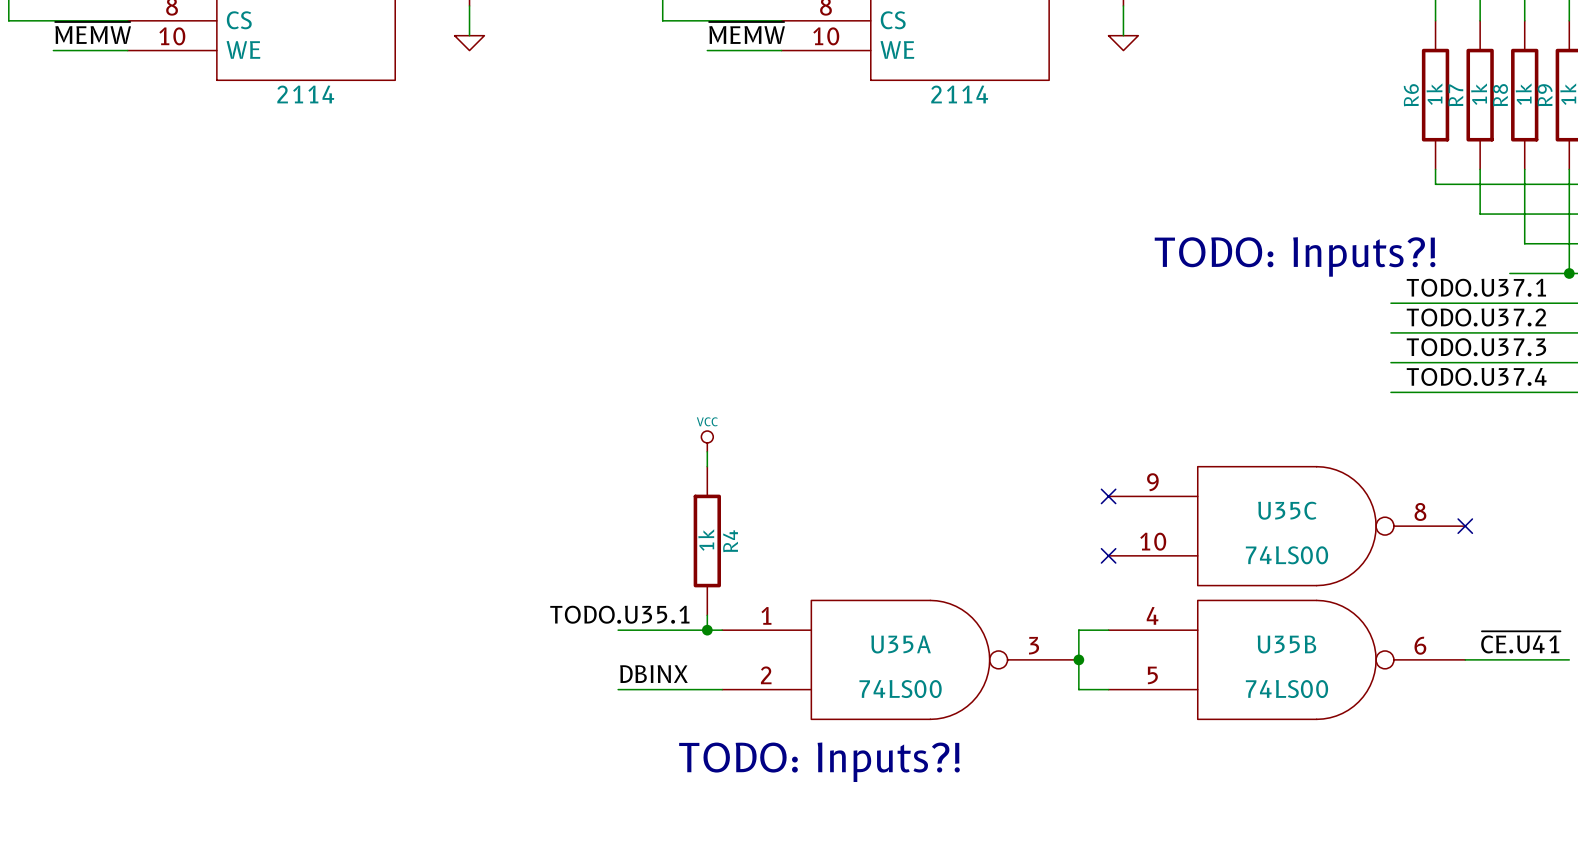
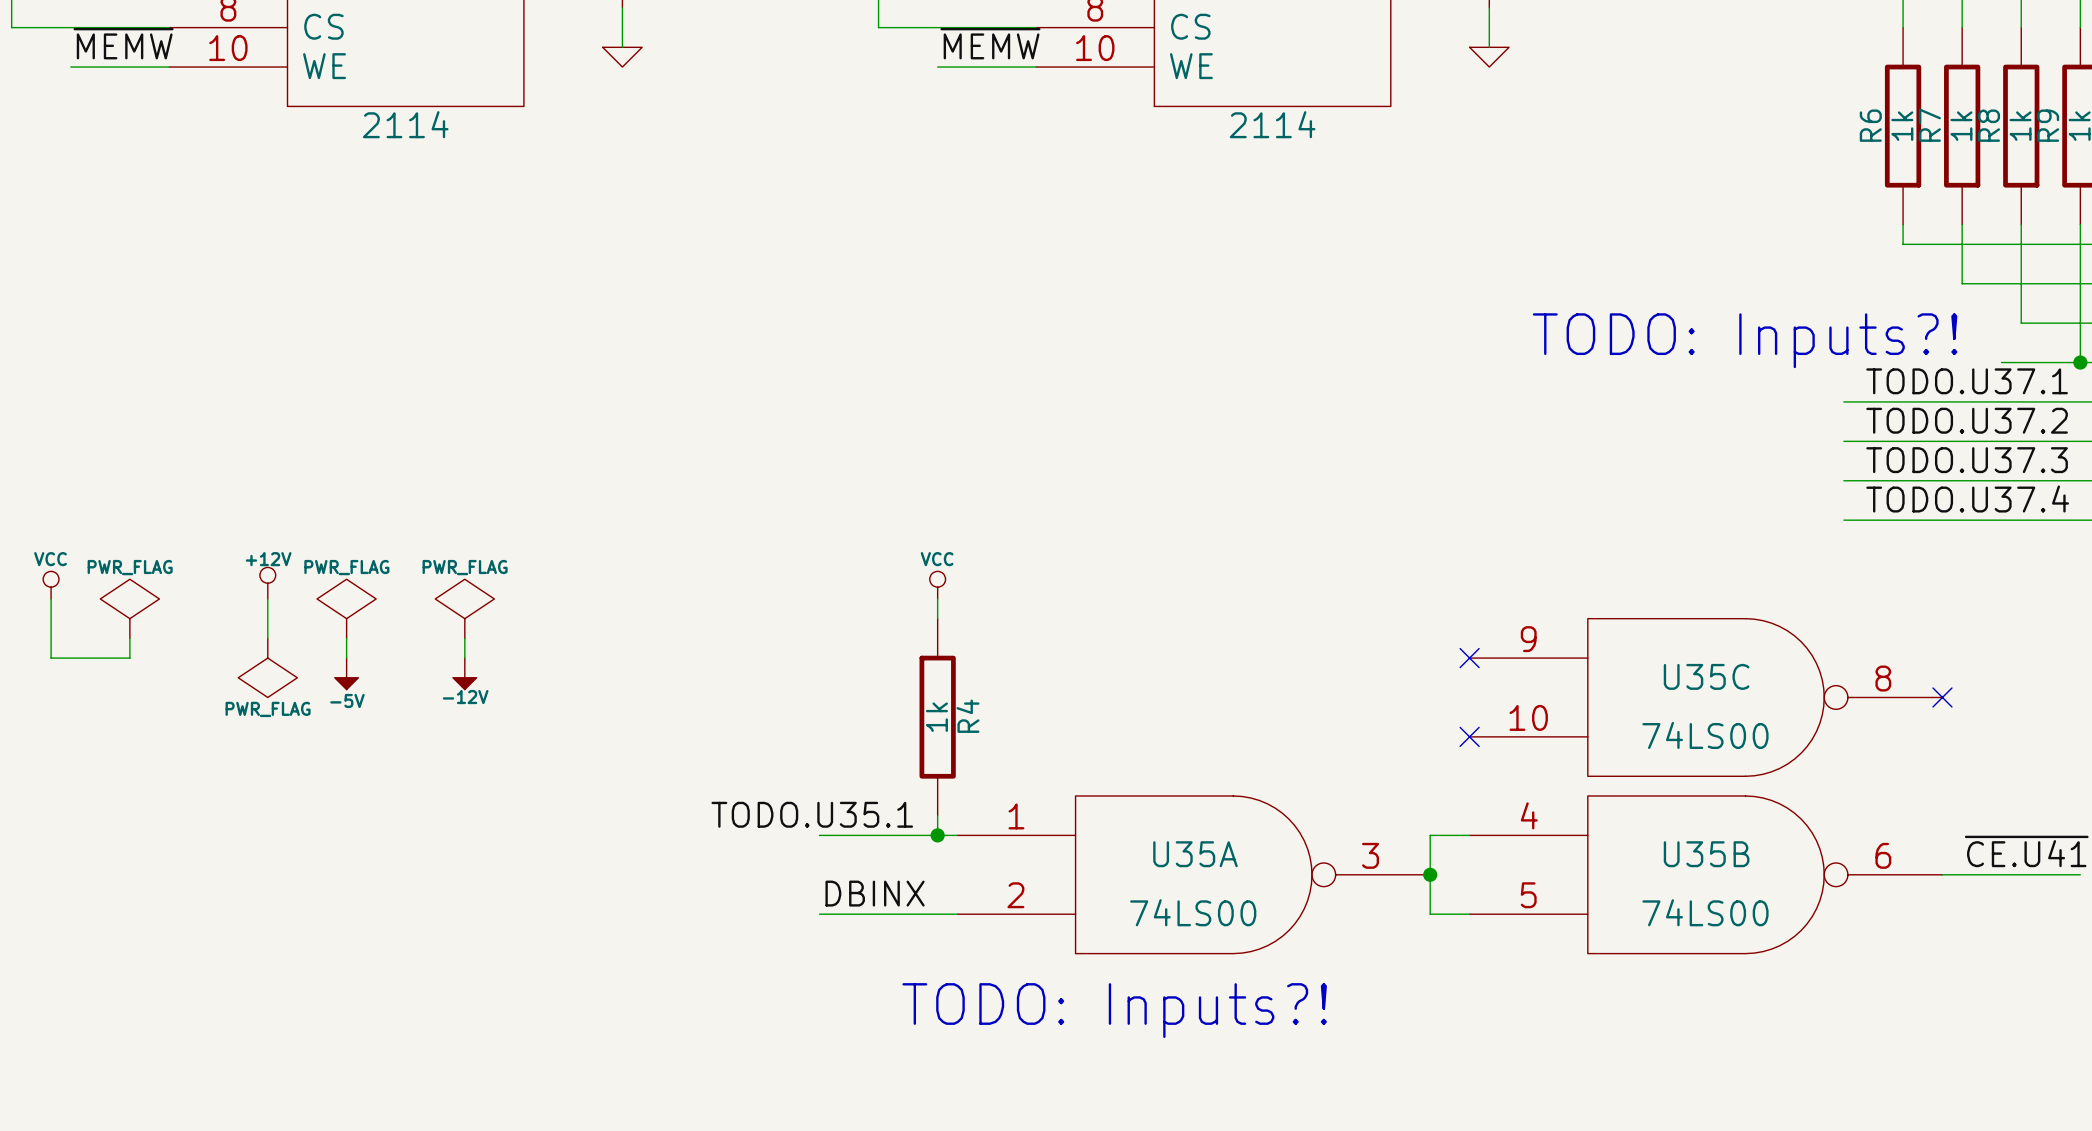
power symbol: none -> +12V (267, 583)
power symbol: none -> VCC (51, 585)
wire: none -> (51, 598) (51, 658) (129, 658) (129, 638)
wire: none -> (267, 598) (267, 638)
power symbol: none -> PWR_FLAG (129, 608)
power symbol: none -> PWR_FLAG (346, 608)
power symbol: none -> PWR_FLAG (464, 608)
wire: none -> (346, 638) (346, 658)
wire: none -> (464, 638) (464, 658)
power symbol: none -> PWR_FLAG (267, 667)
power symbol: none -> -5V (346, 673)
power symbol: none -> -12V (464, 673)

